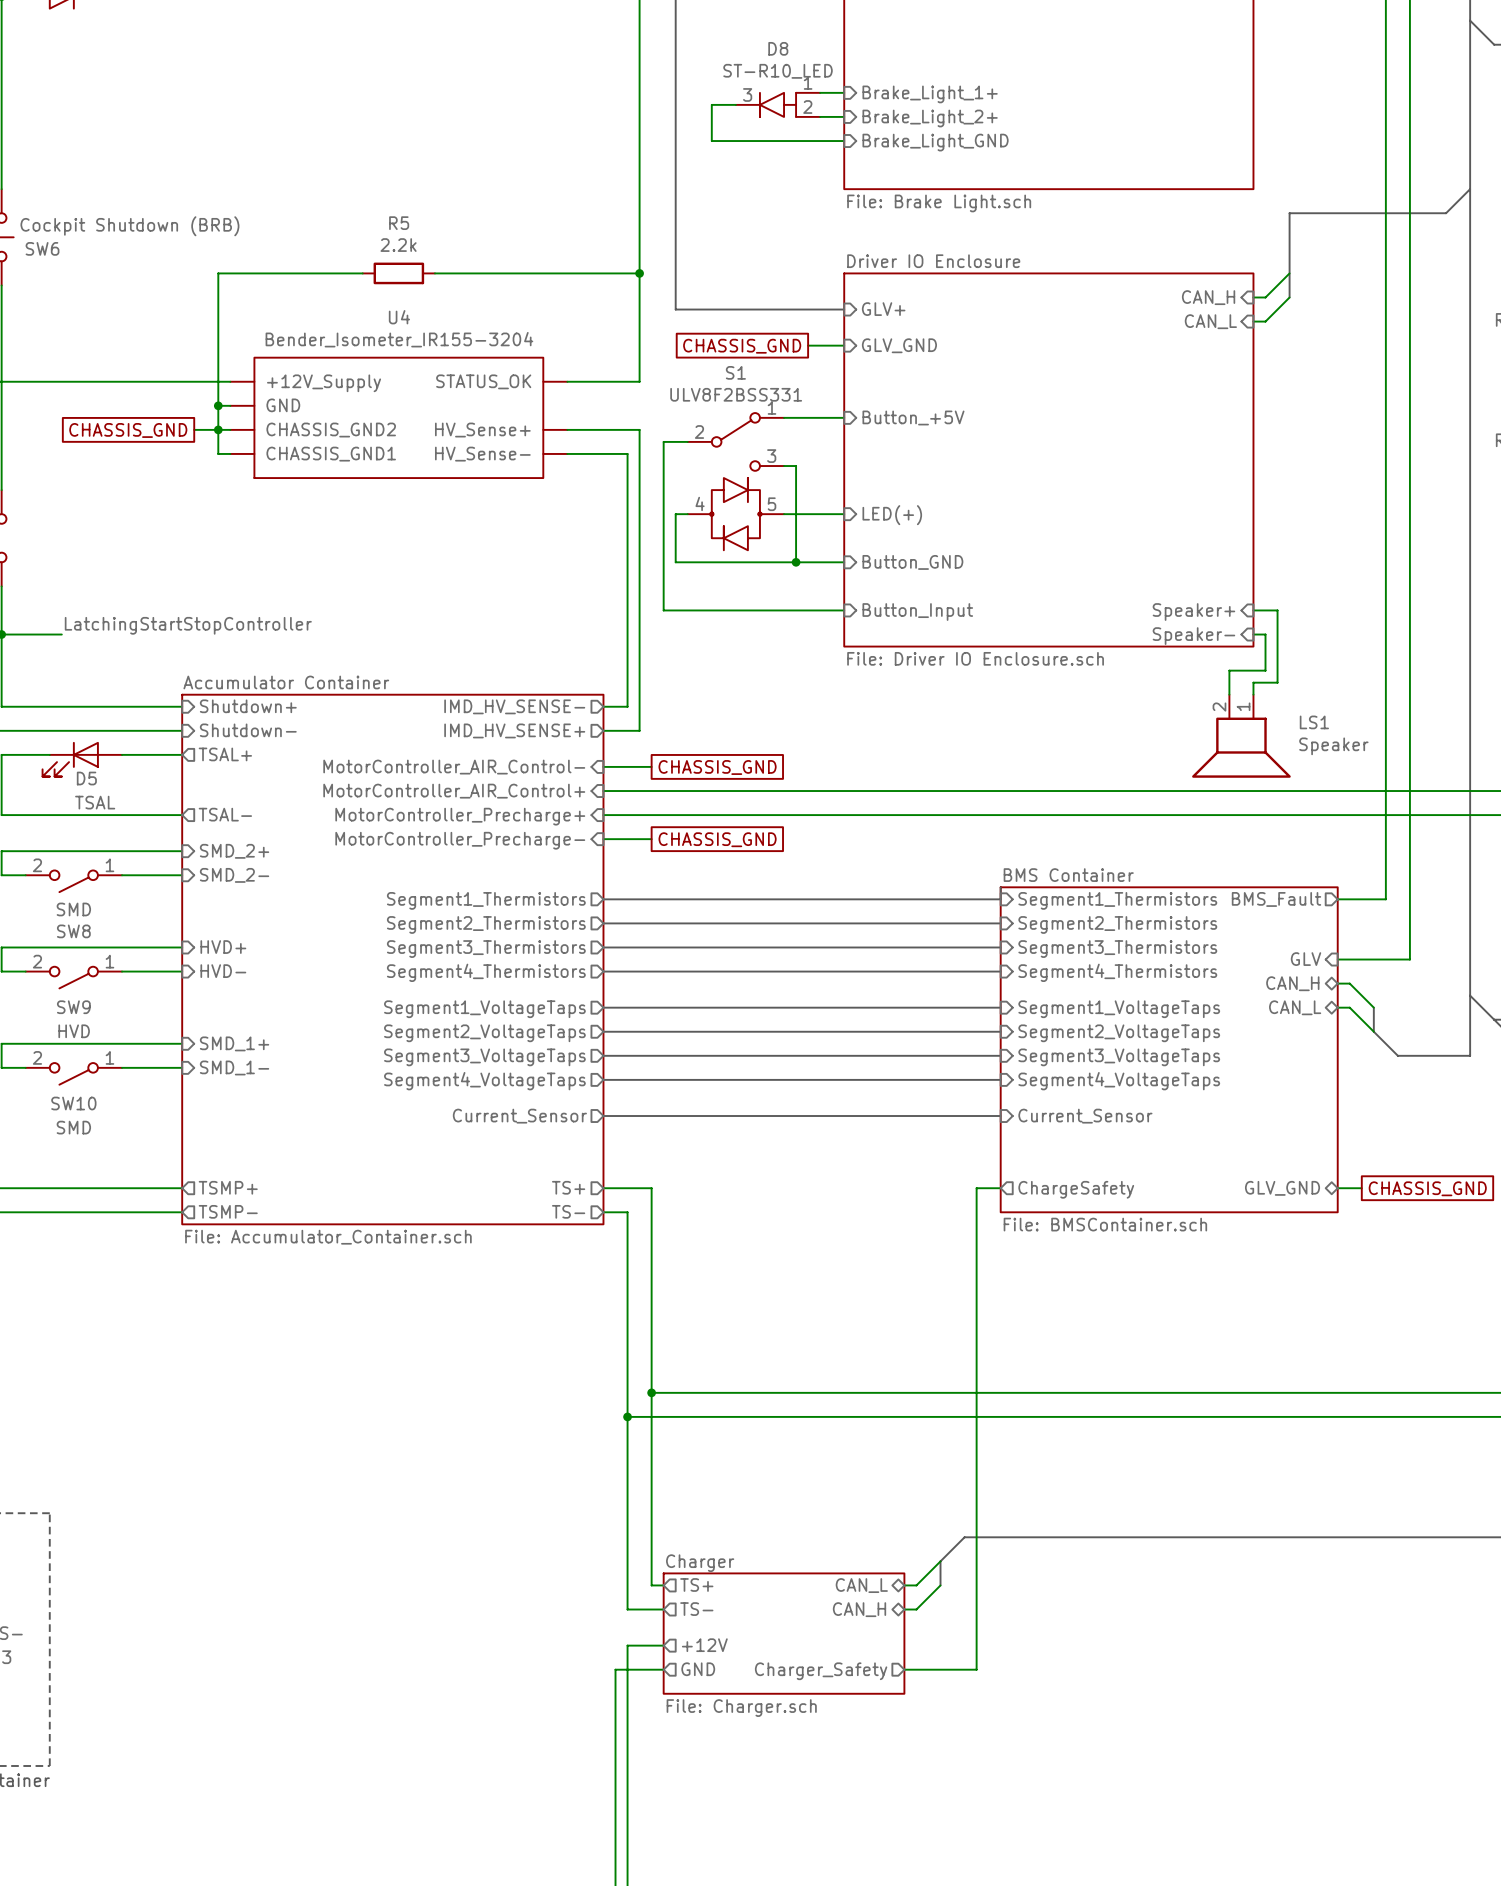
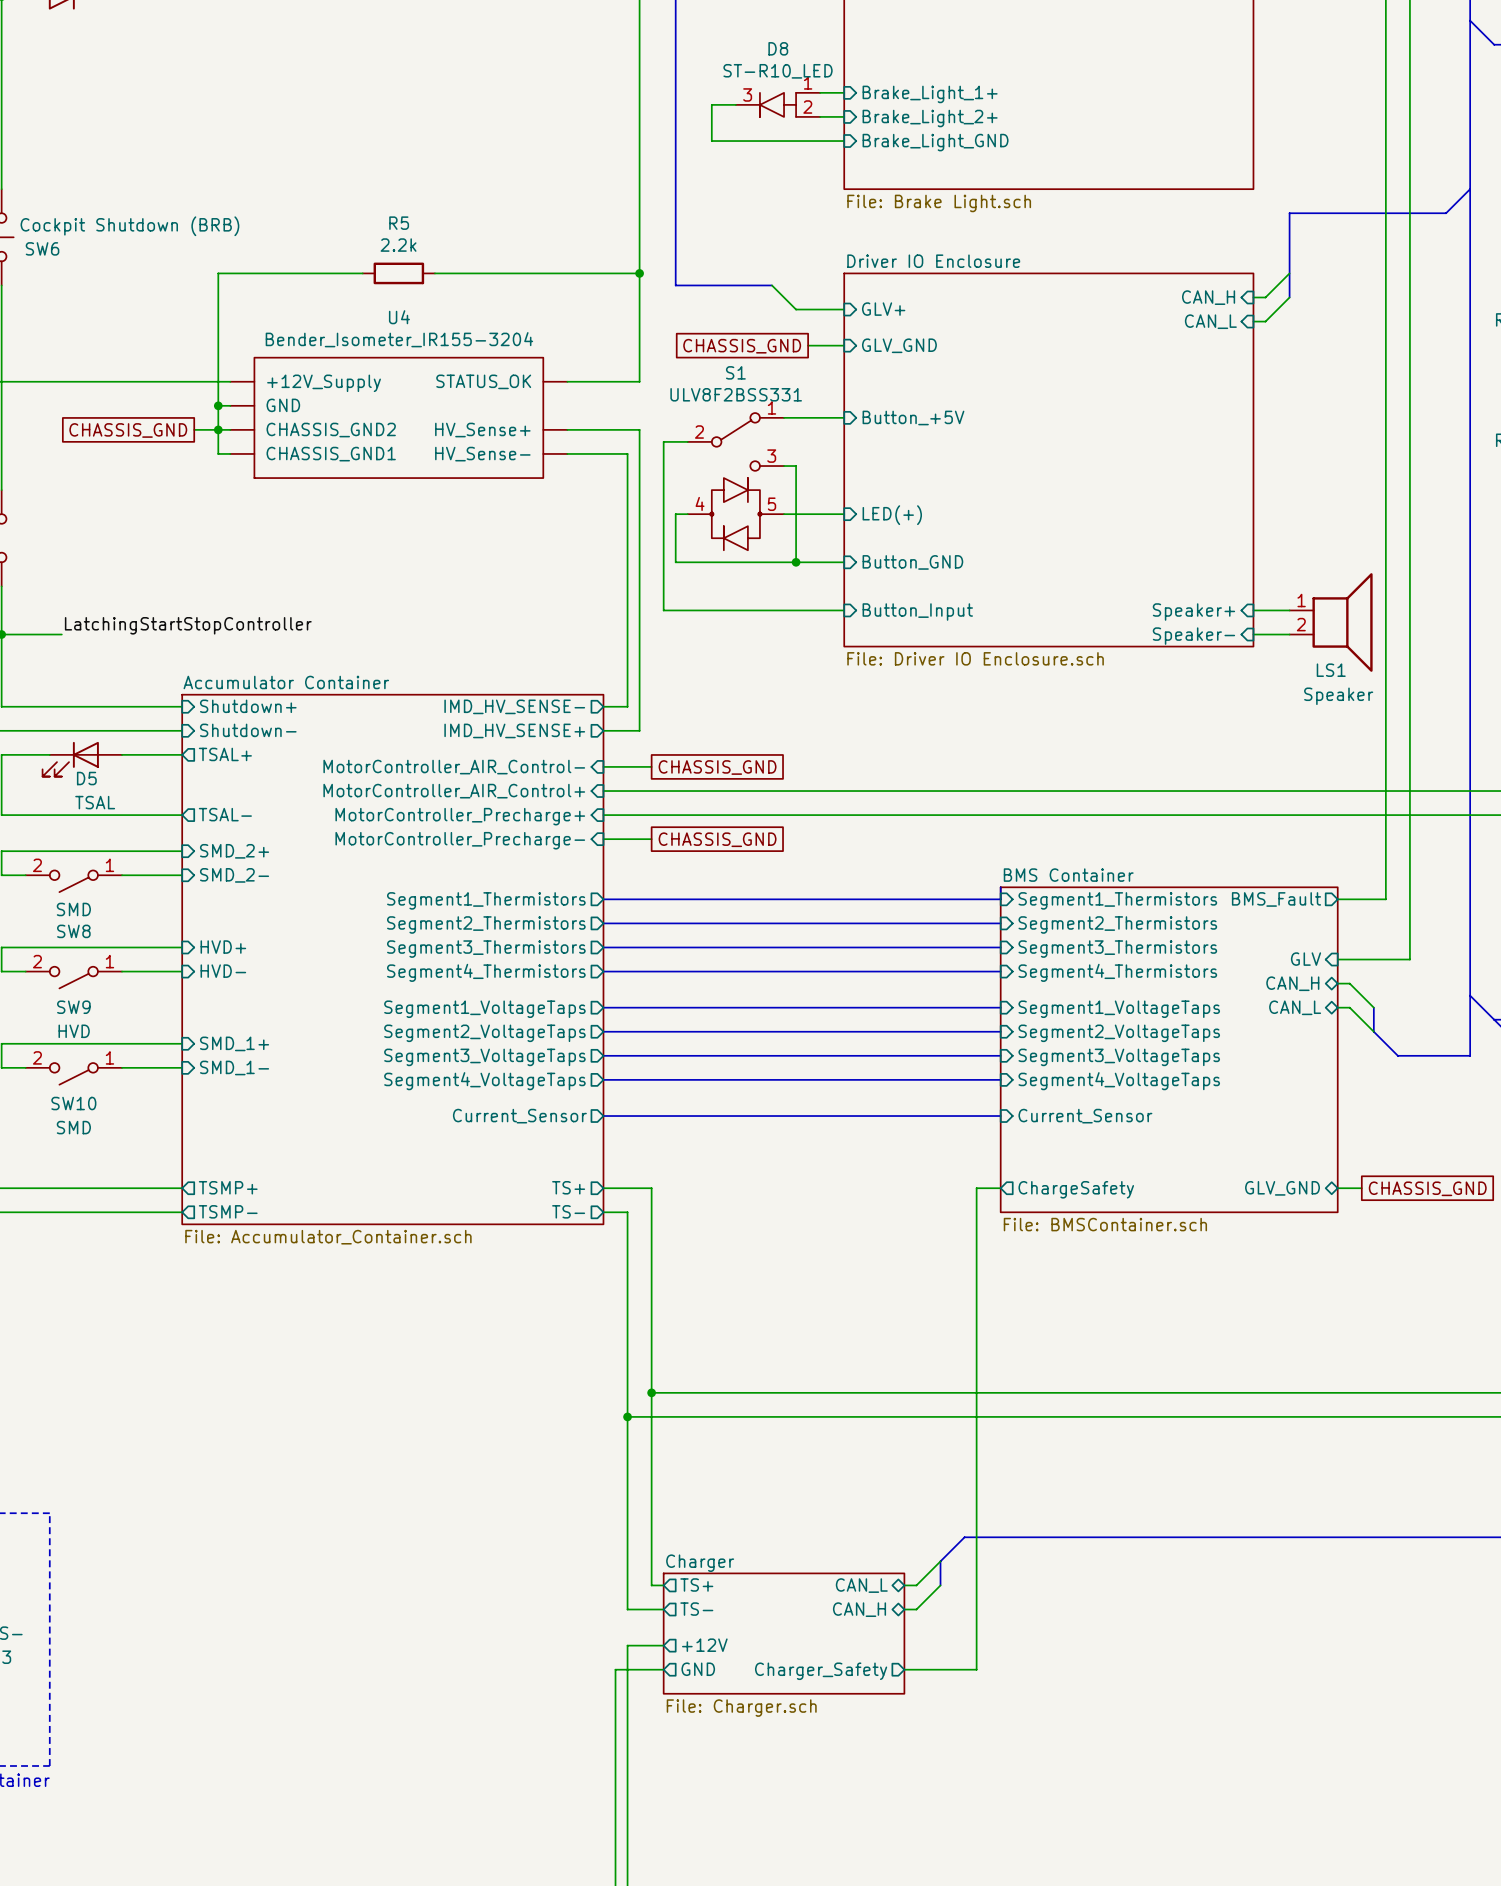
bus: (675, 285) (675, 309) (844, 309) -> (675, 285) (771, 285)
wire: none -> (771, 285) (796, 309) (844, 309)
wire: (1277, 610) (1277, 682) (1253, 682) (1253, 694) -> (1277, 610) (1289, 610)
wire: (1265, 634) (1265, 670) (1229, 670) (1229, 694) -> (1265, 634) (1289, 634)
LS1 name position: LS1 (1314, 722) -> LS1 (1331, 670)
LS1 position: (1241, 736) -> (1331, 622)
LS1 value position: Speaker (1333, 746) -> Speaker (1338, 696)
LS1 rotation: 0° (1241, 747) -> 90° counterclockwise (1342, 622)

